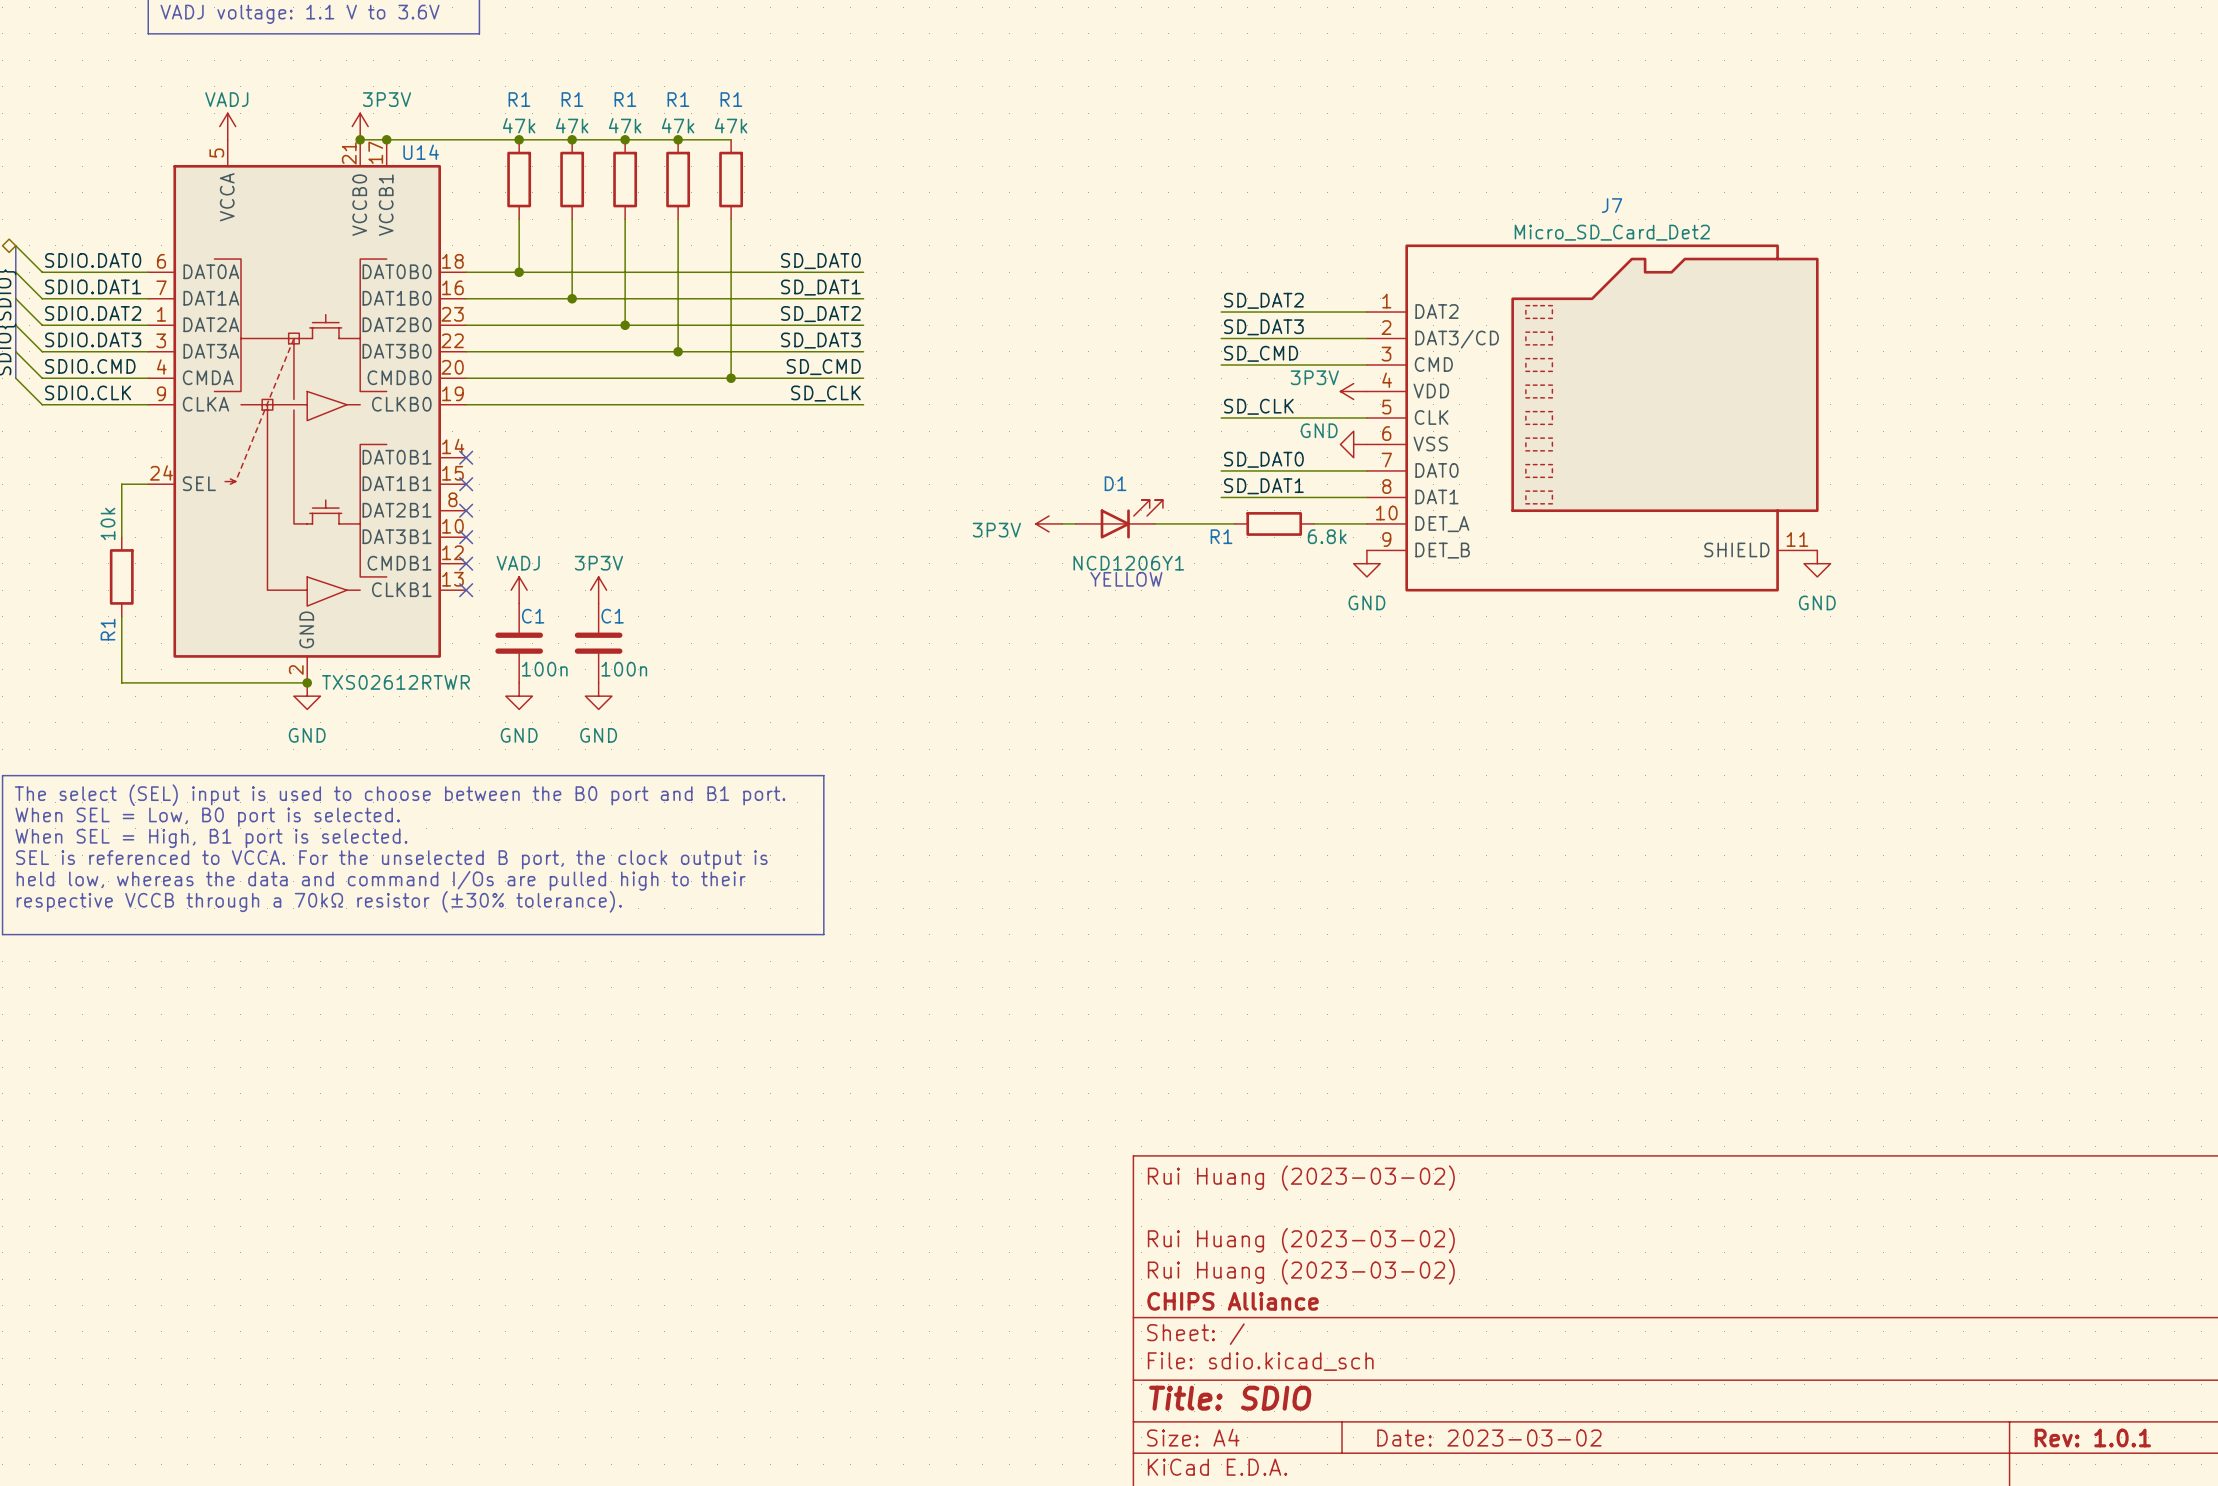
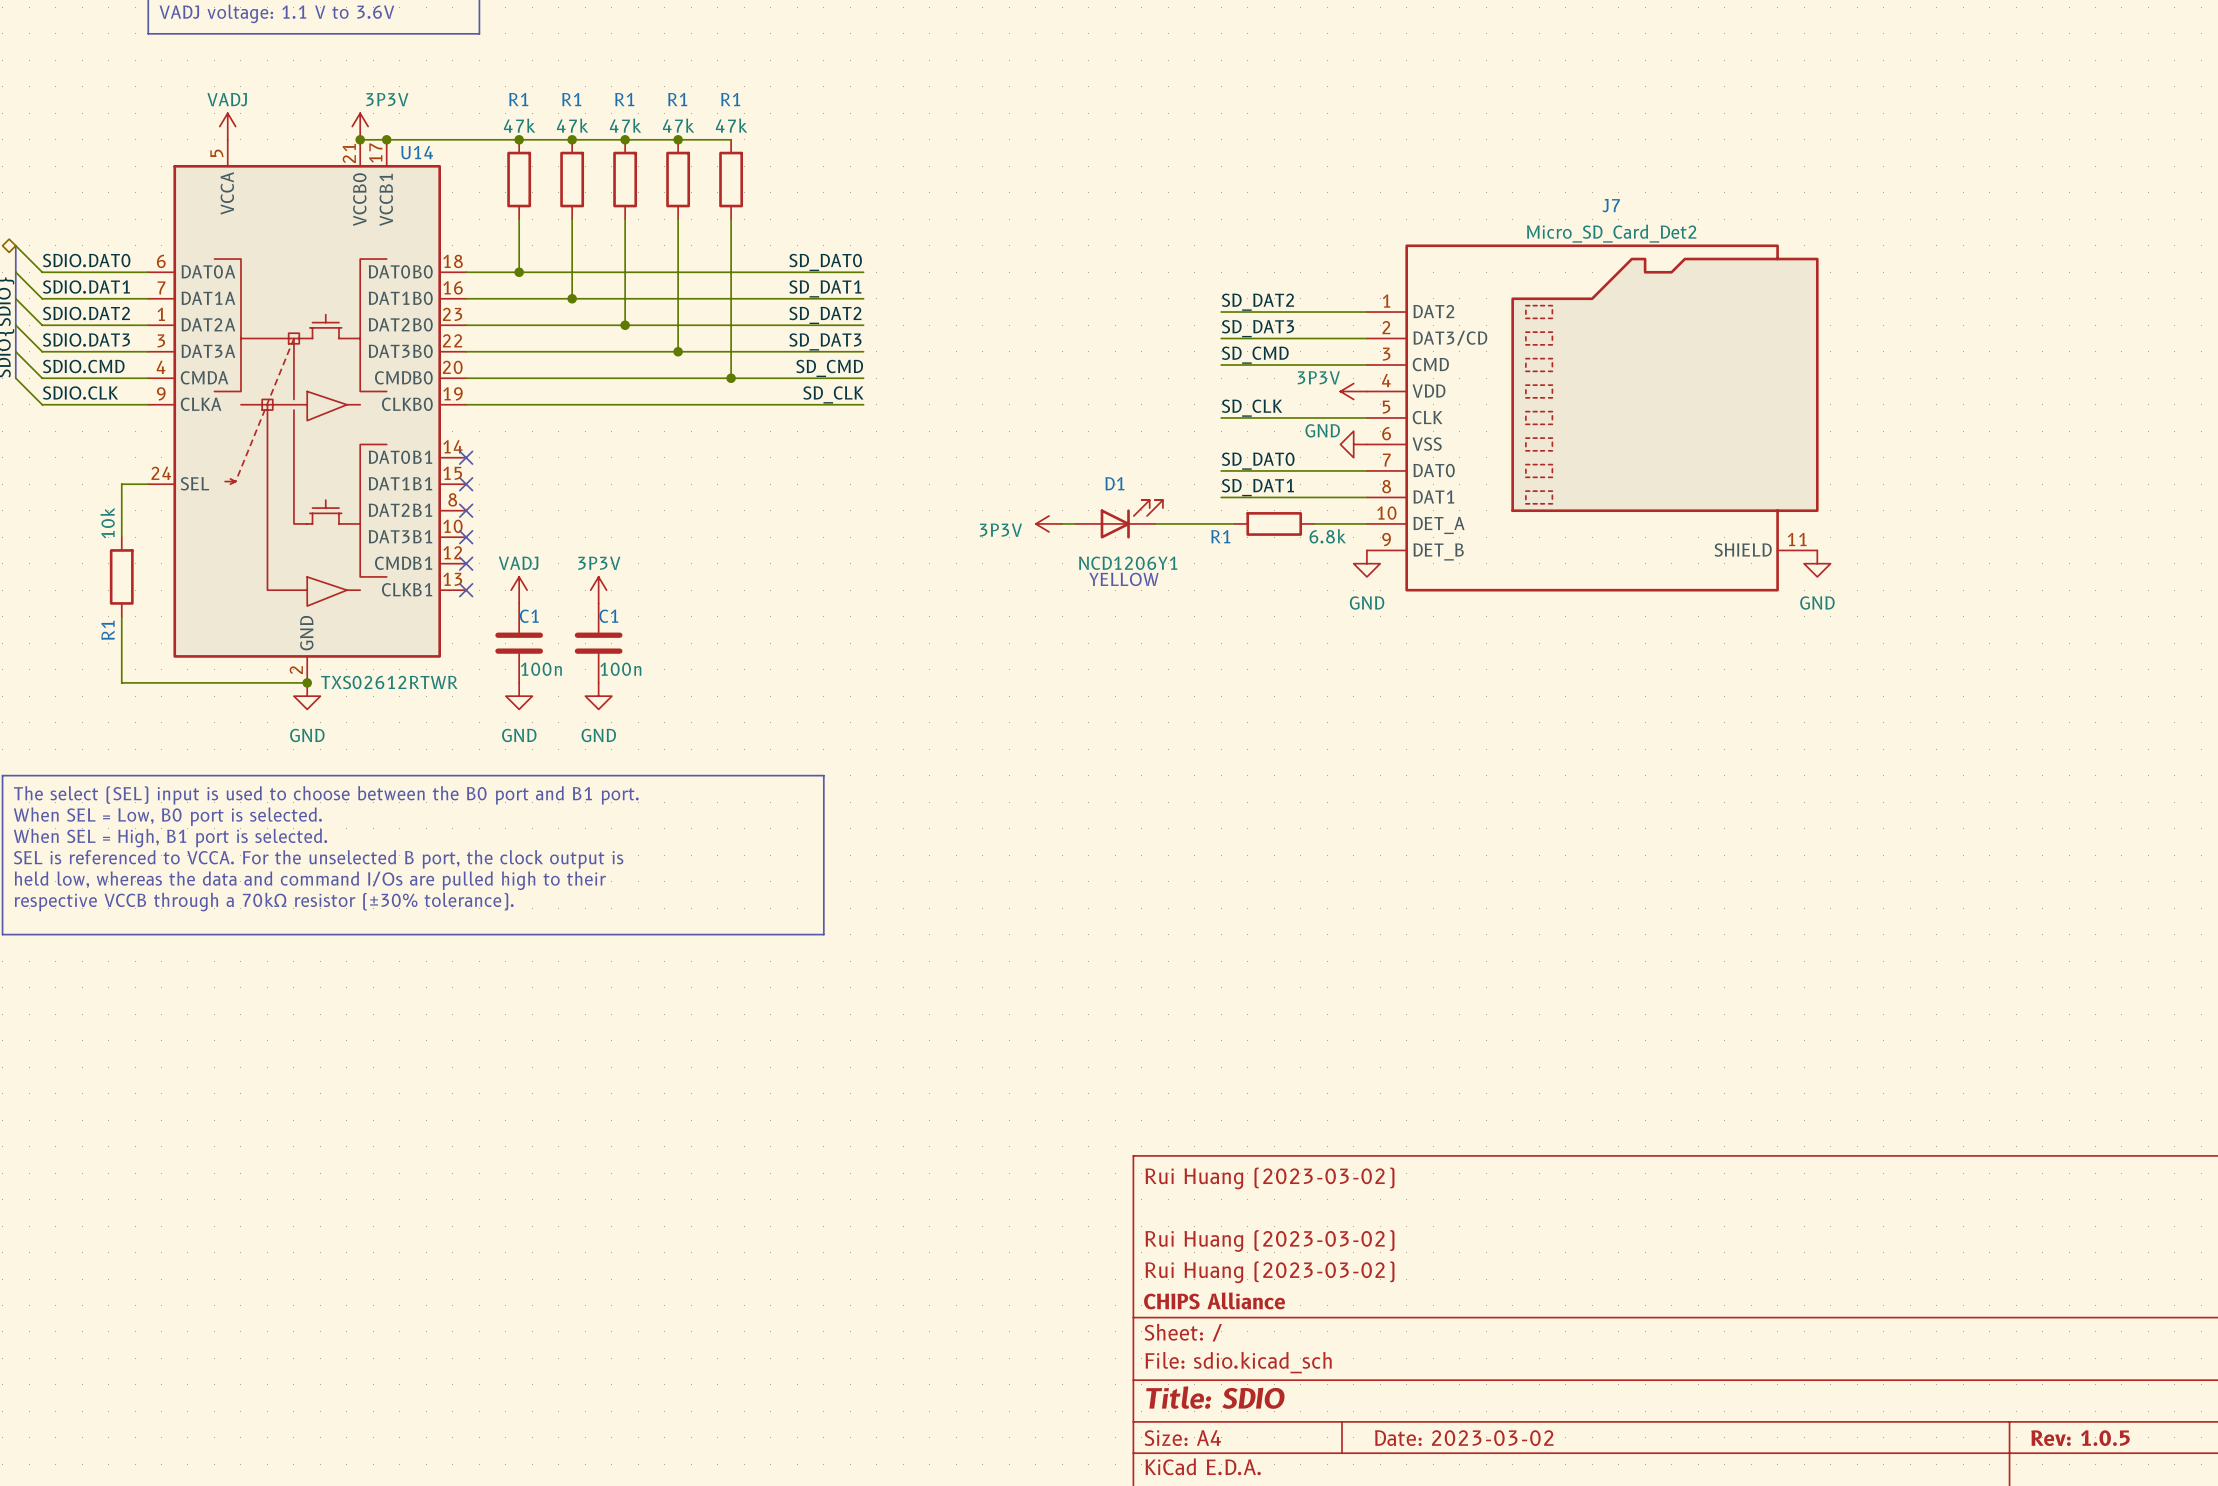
title block: Rev: 1.0.1 (2092, 1438) -> Rev: 1.0.5 (2080, 1438)

